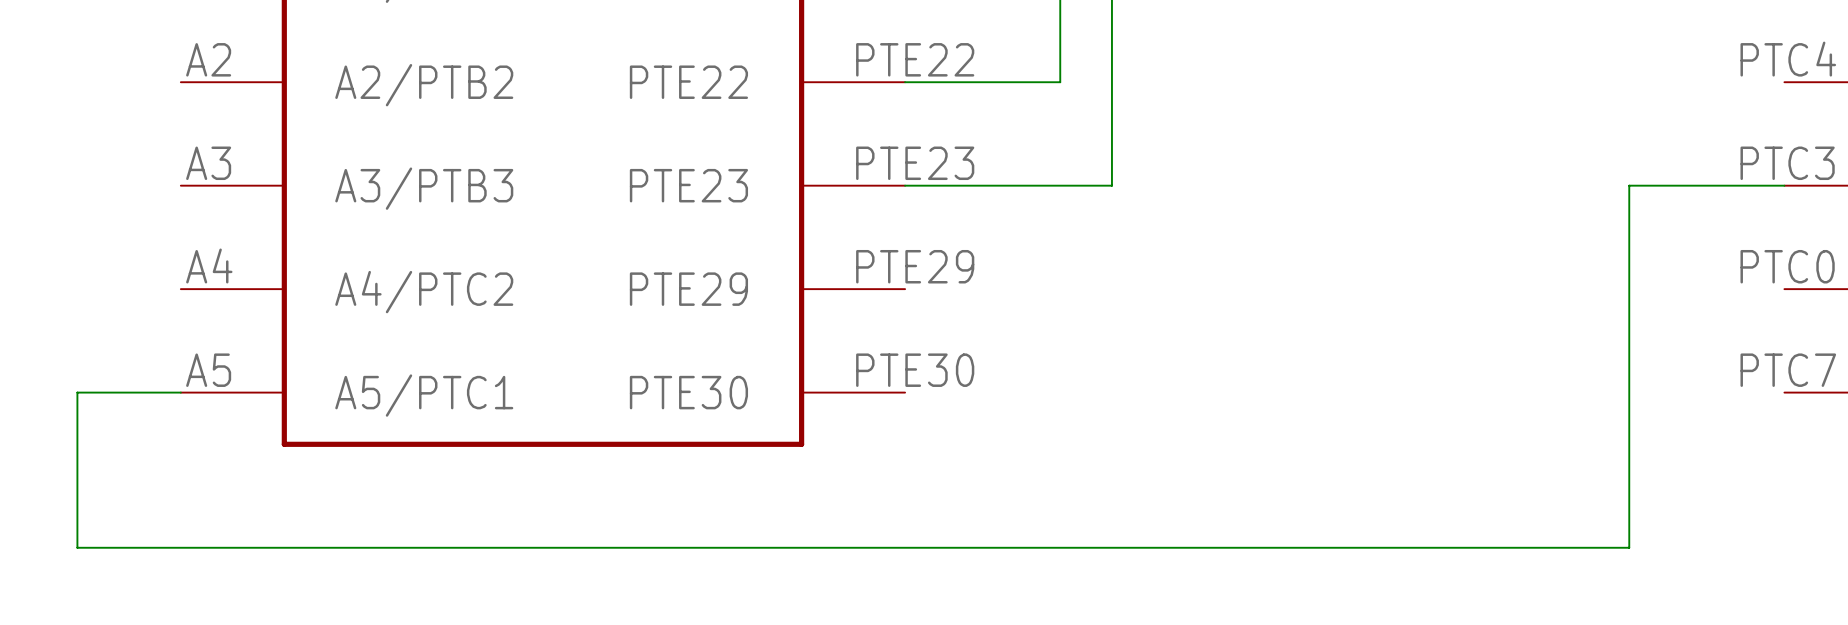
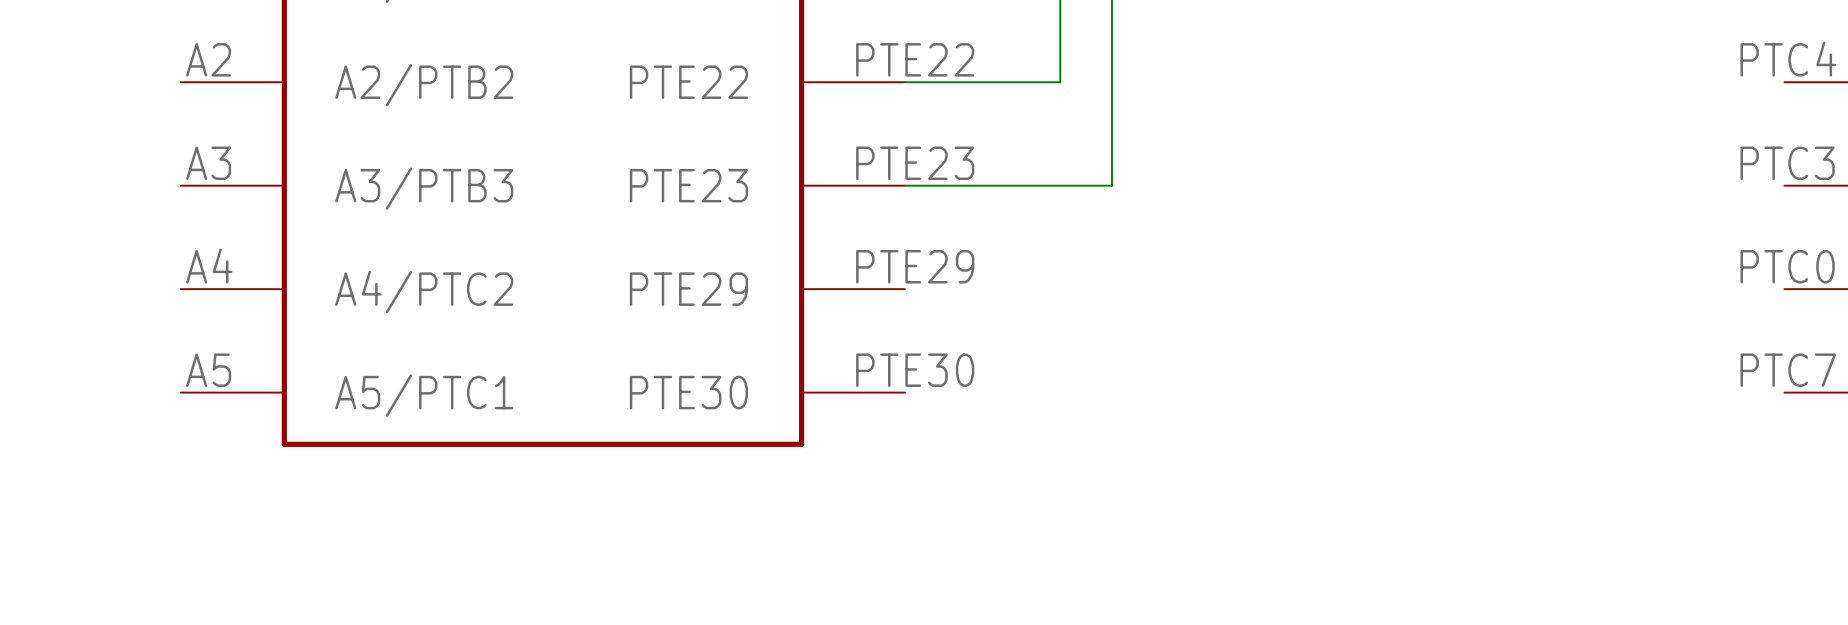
wire: (1784, 185) (1629, 185) (1629, 547) (77, 547) (77, 392) (180, 392) -> none

